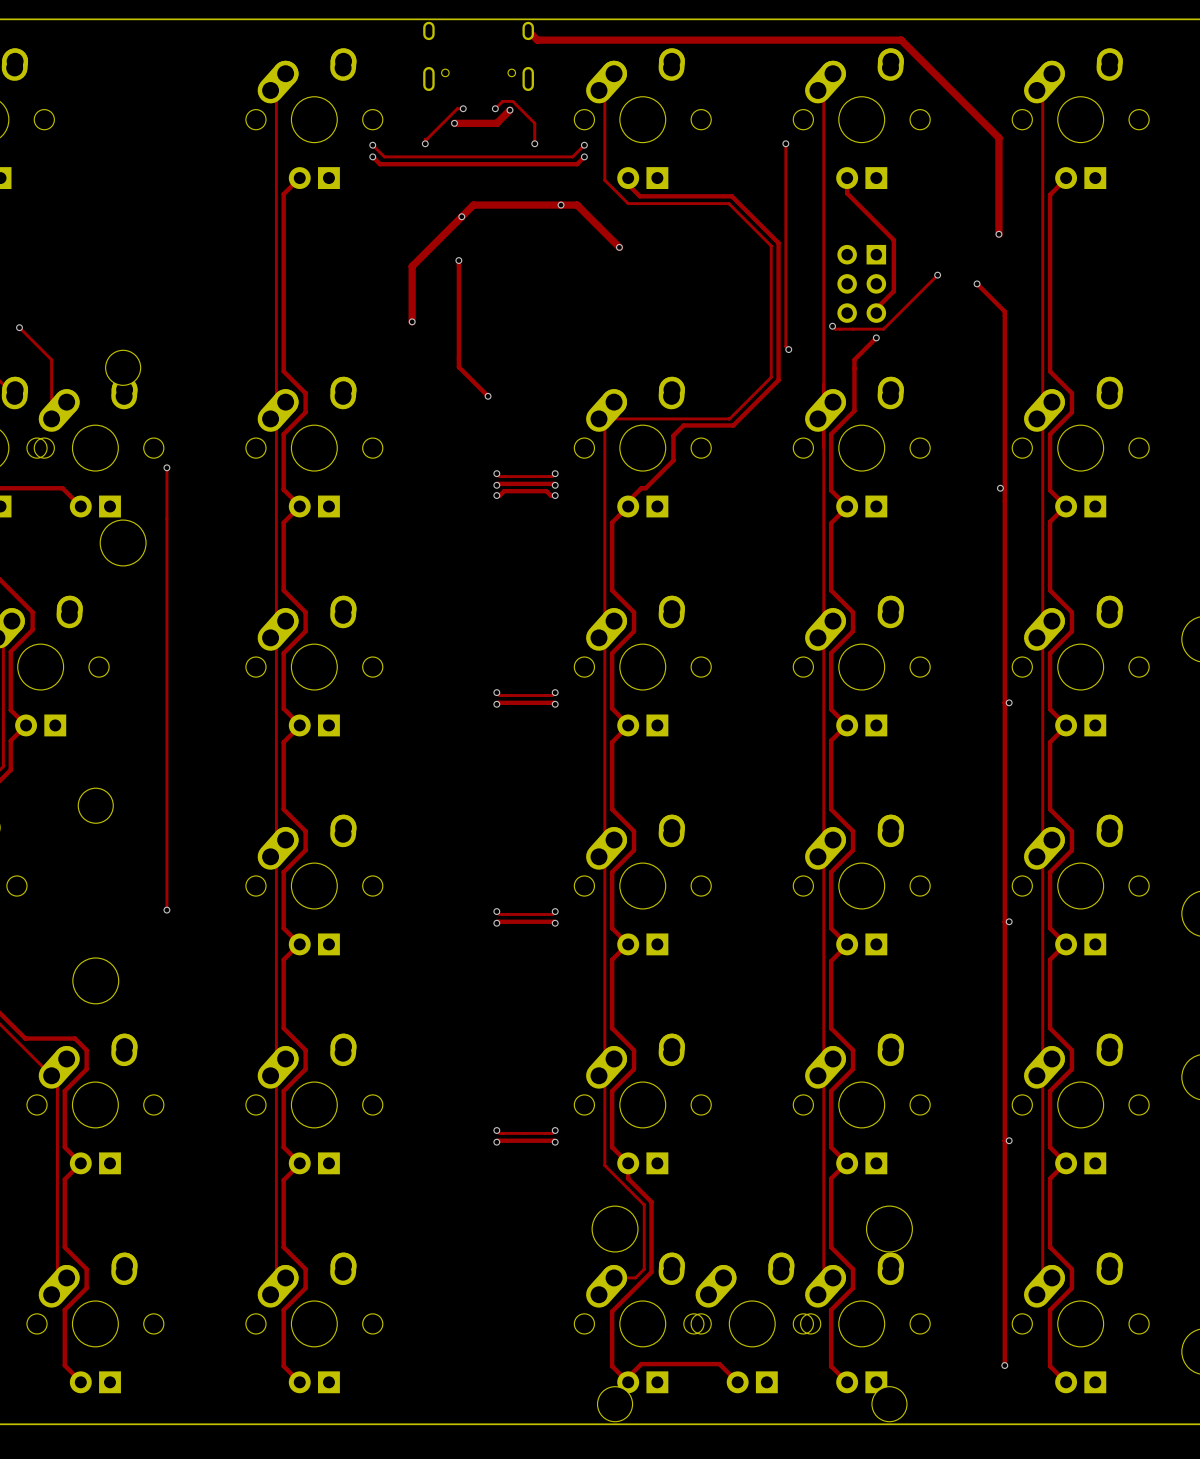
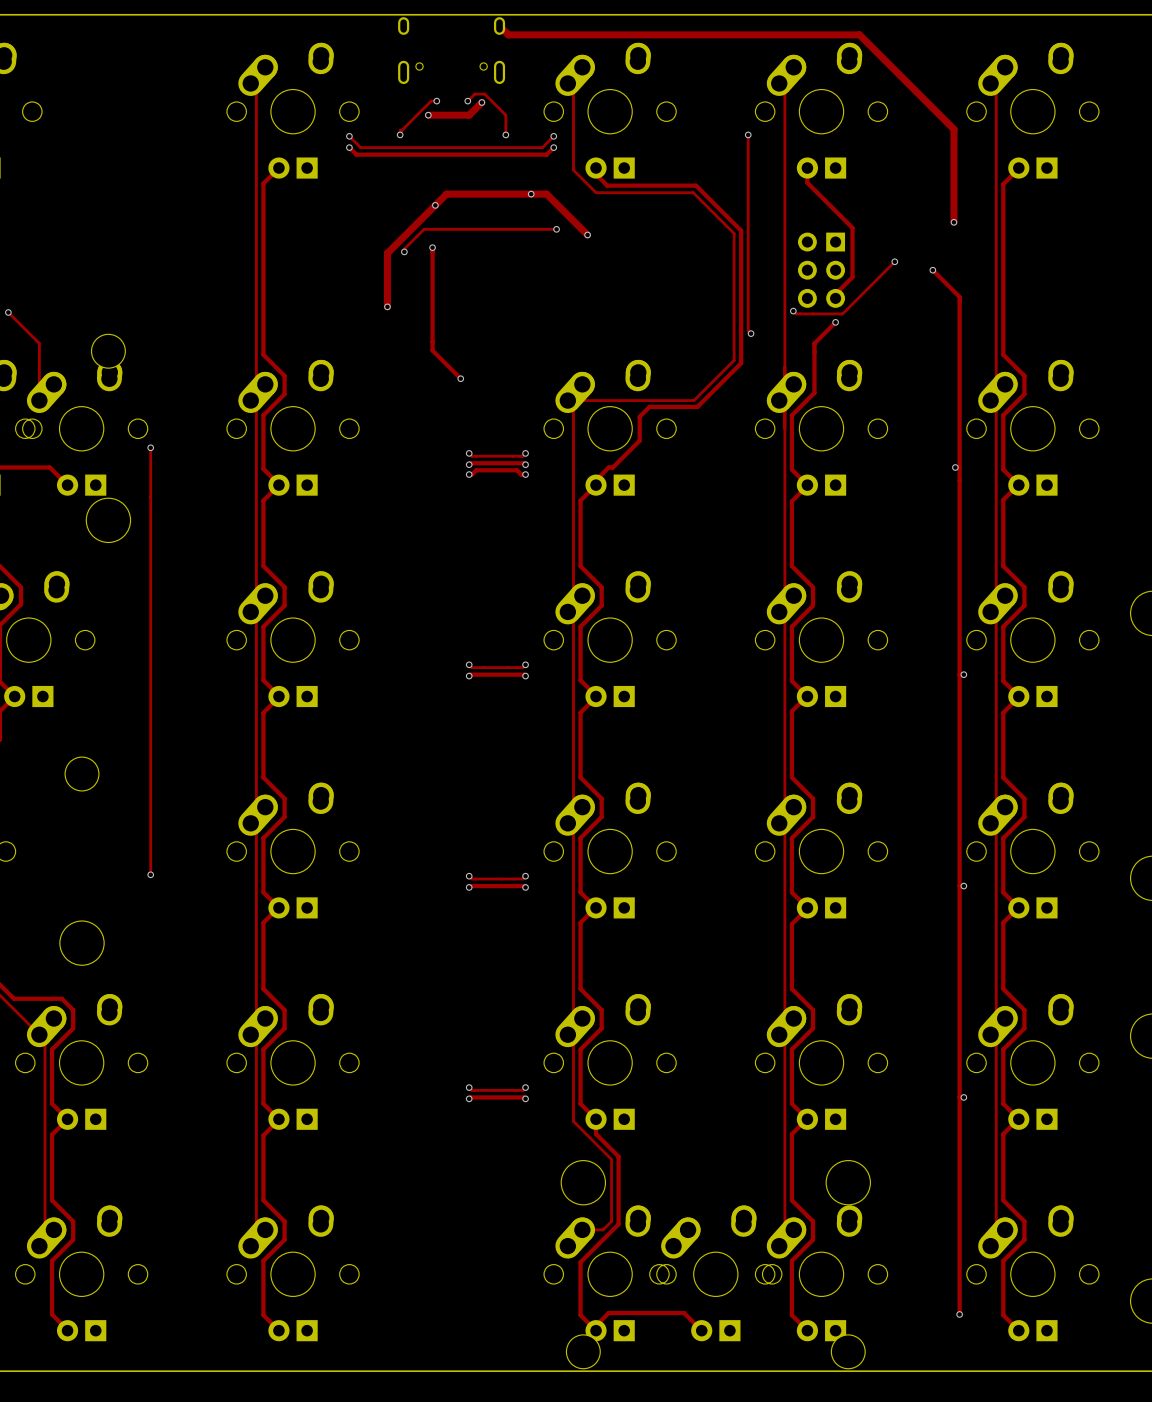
track: none -> (556, 229) (424, 229) (404, 249) (404, 251)
via: none -> (556, 229)
via: none -> (404, 251)

